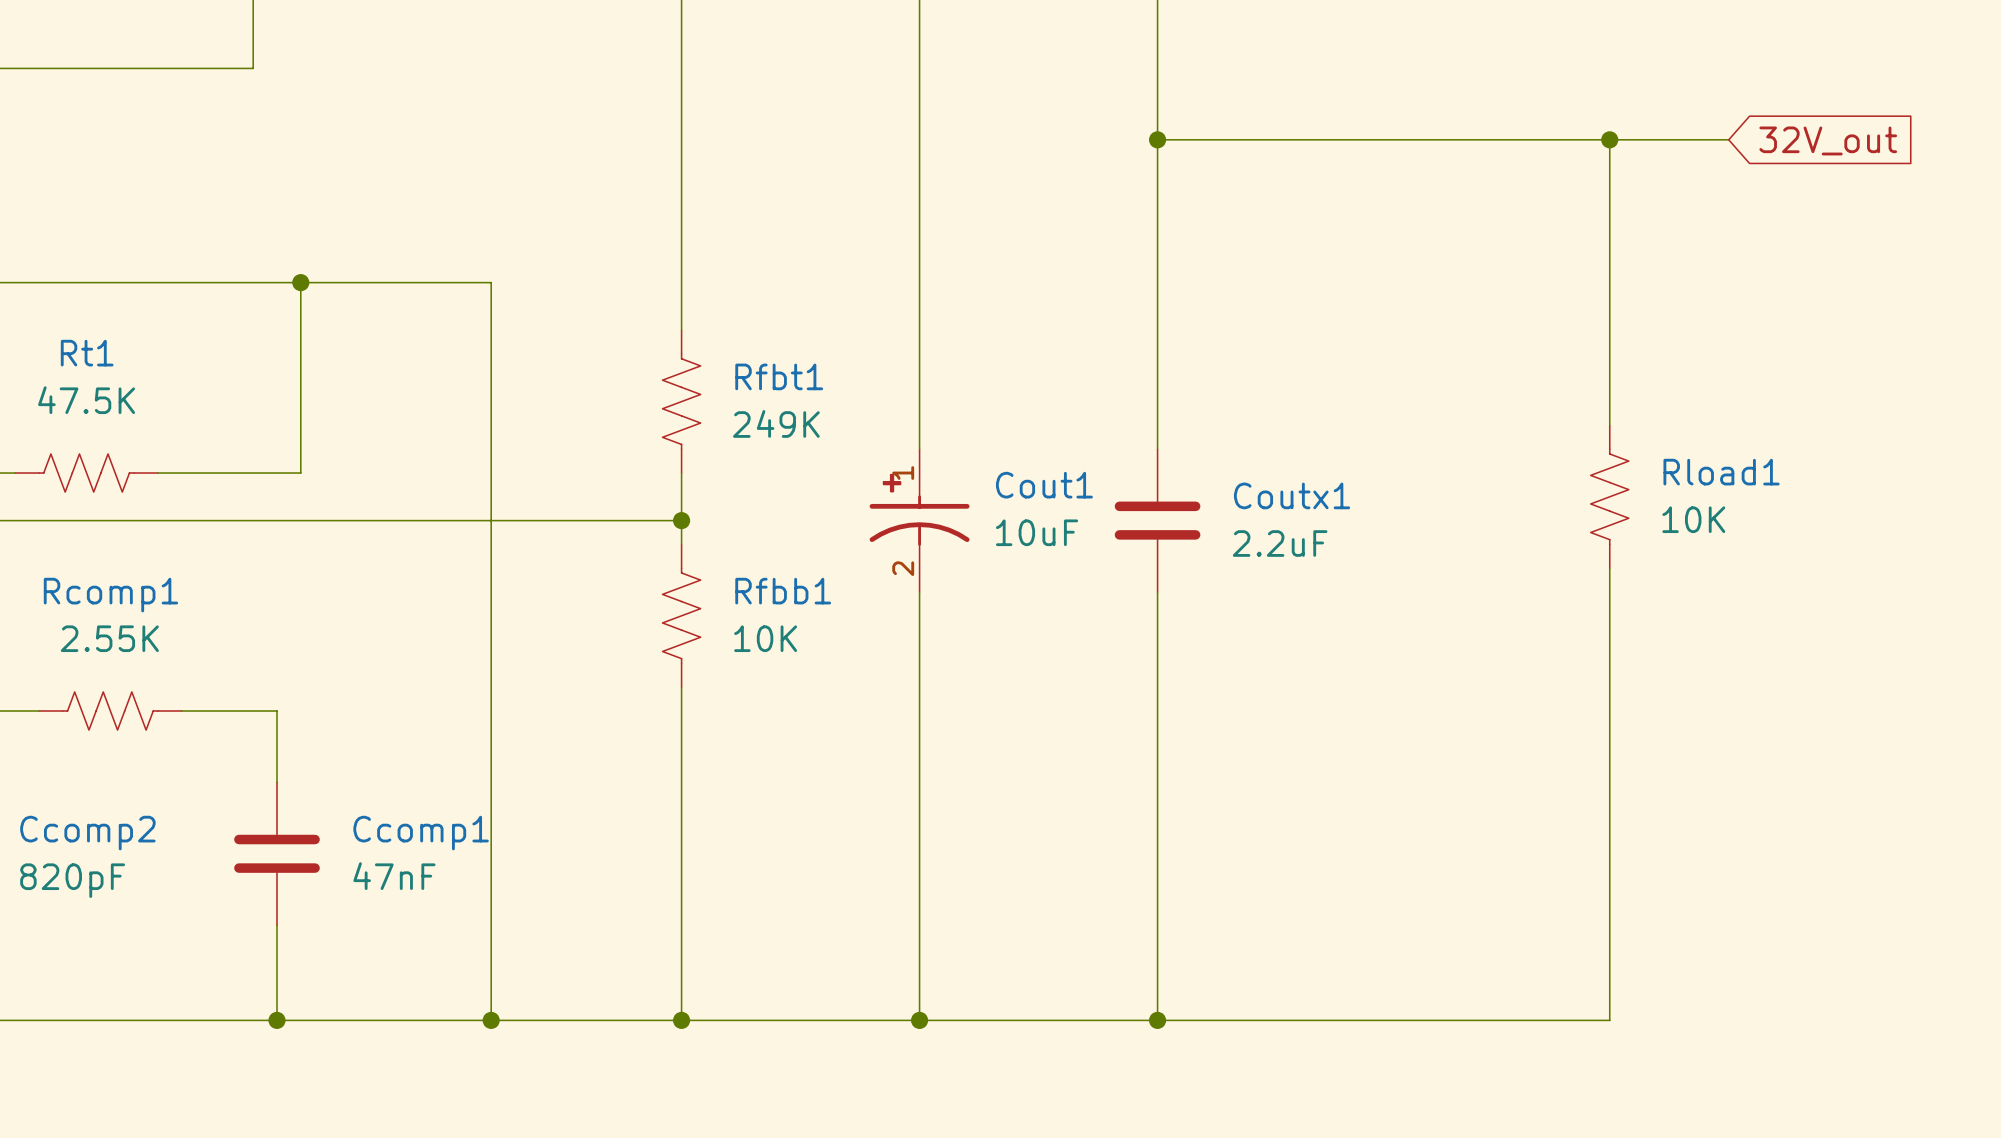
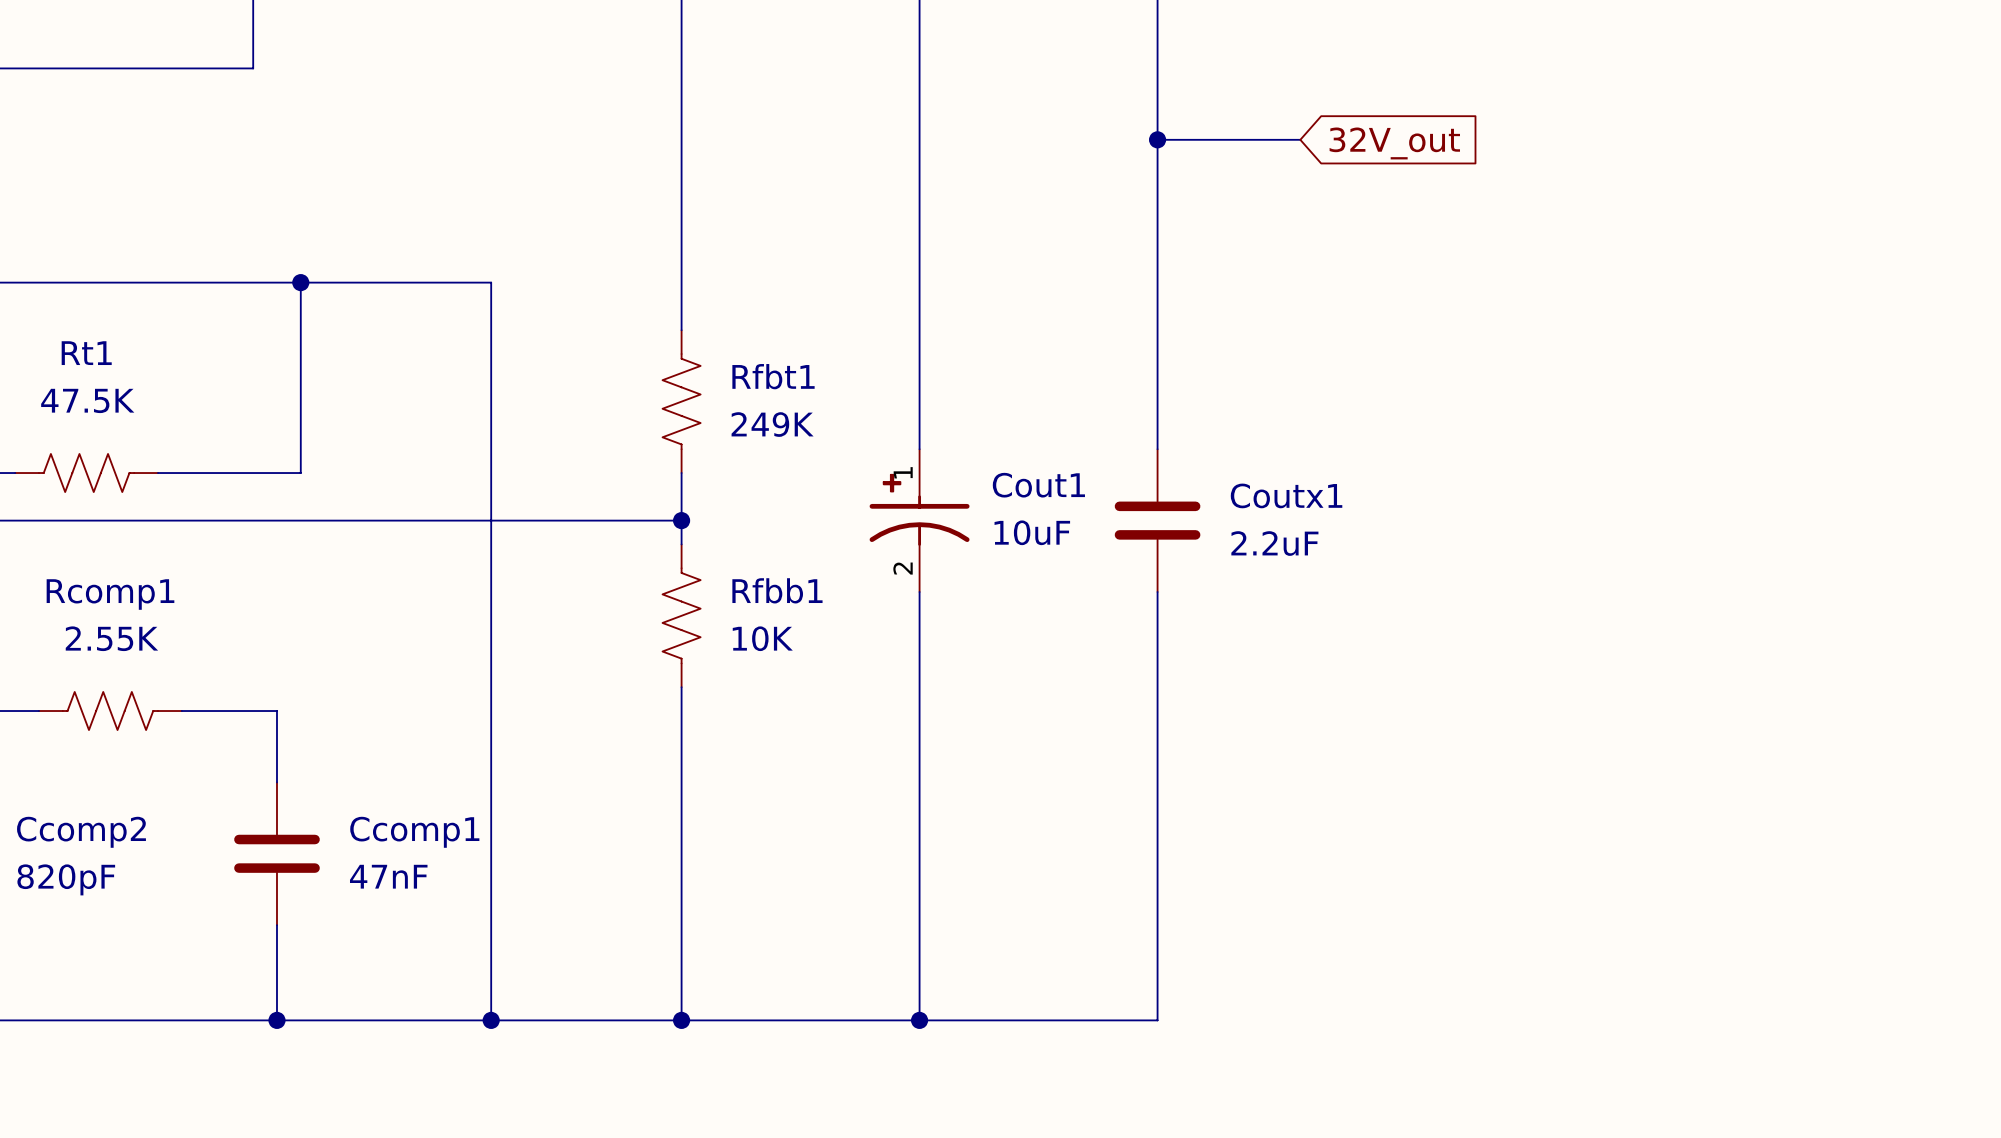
wire: (1300, 139) (1728, 139) -> none
wire: (1609, 139) (1609, 425) -> none
junction: (1609, 139) -> none
global label position: 32V_out (1828, 140) -> 32V_out (1394, 143)
Rload1: 10K (1609, 496) -> none
wire: (1609, 568) (1609, 1020) (1157, 1020) -> none
junction: (1157, 1020) -> none

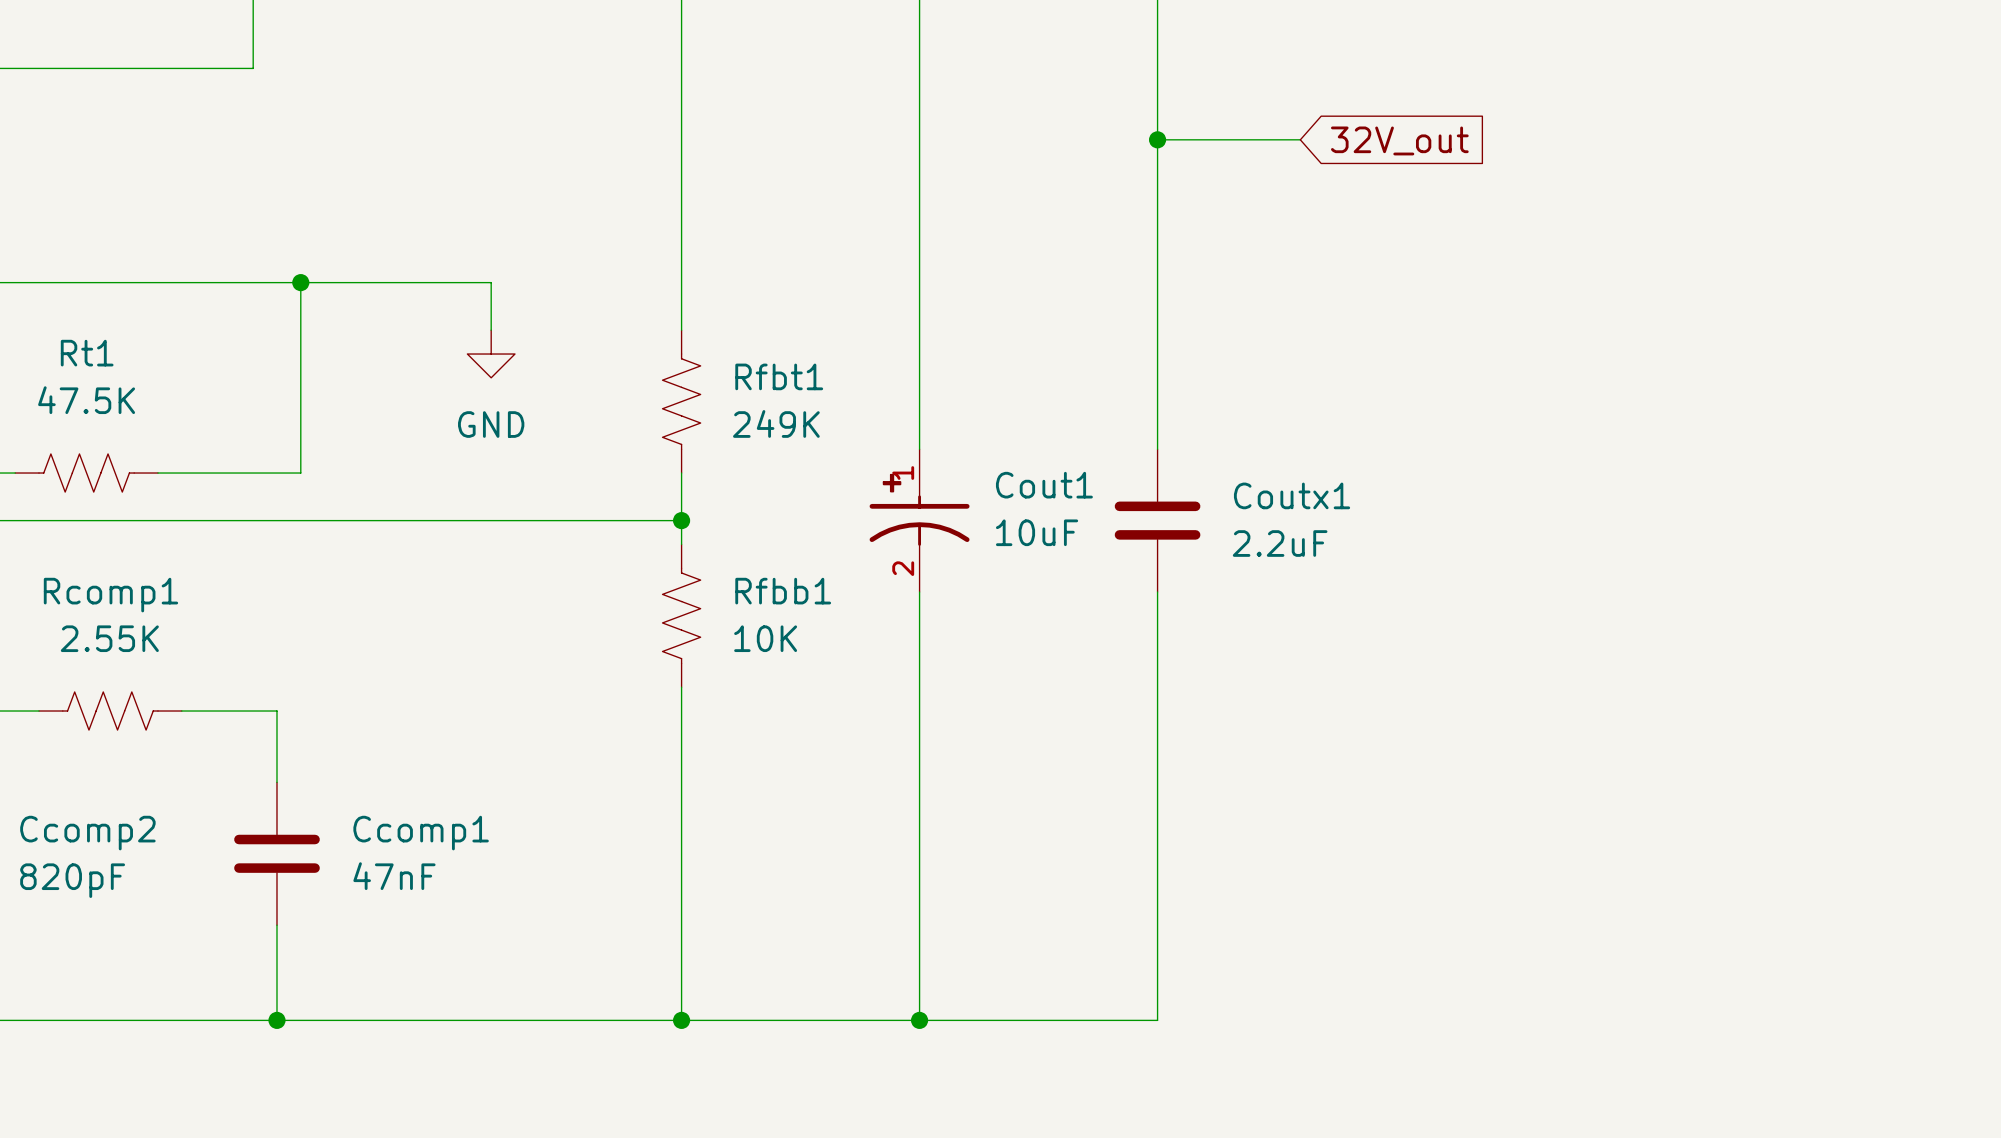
wire: (491, 330) (491, 1020) -> none
power symbol: none -> GND (491, 354)
junction: (491, 1020) -> none

